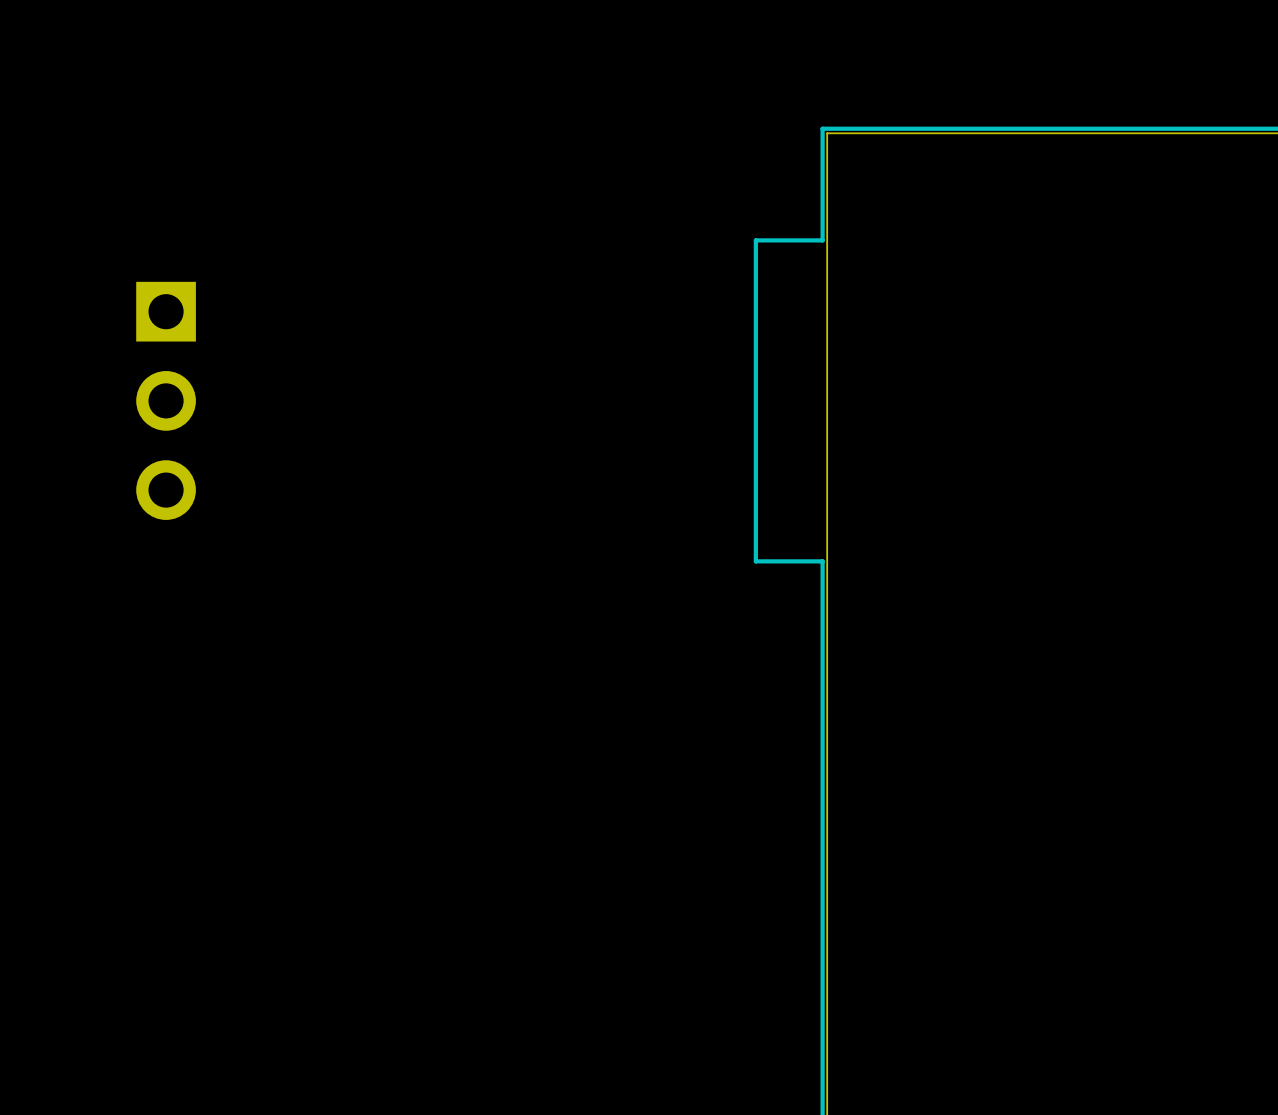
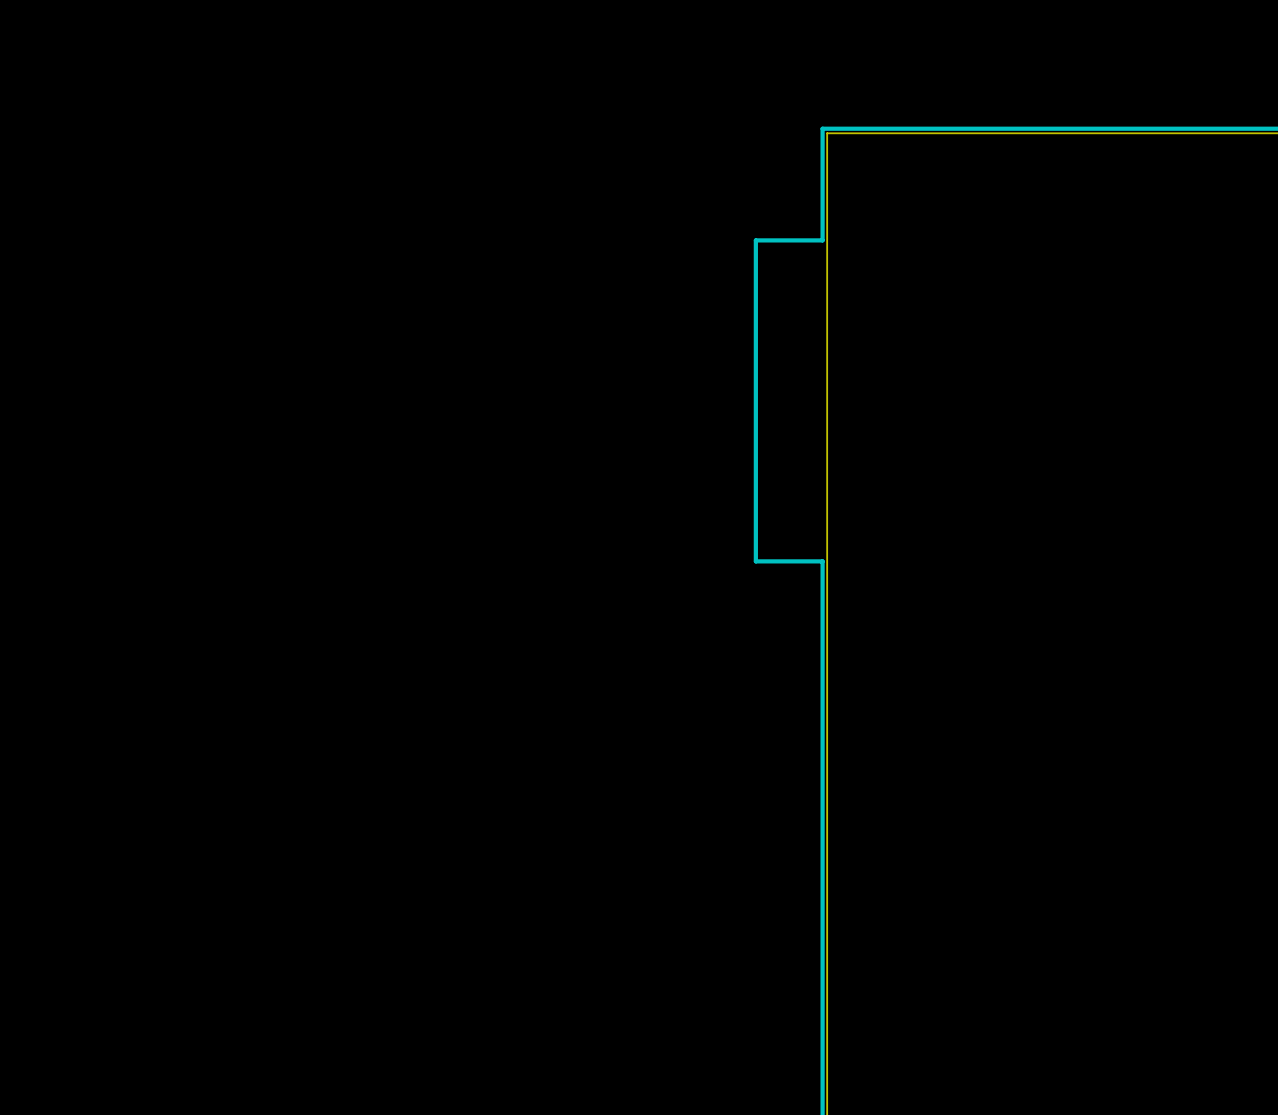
part: (166, 400) -> none

